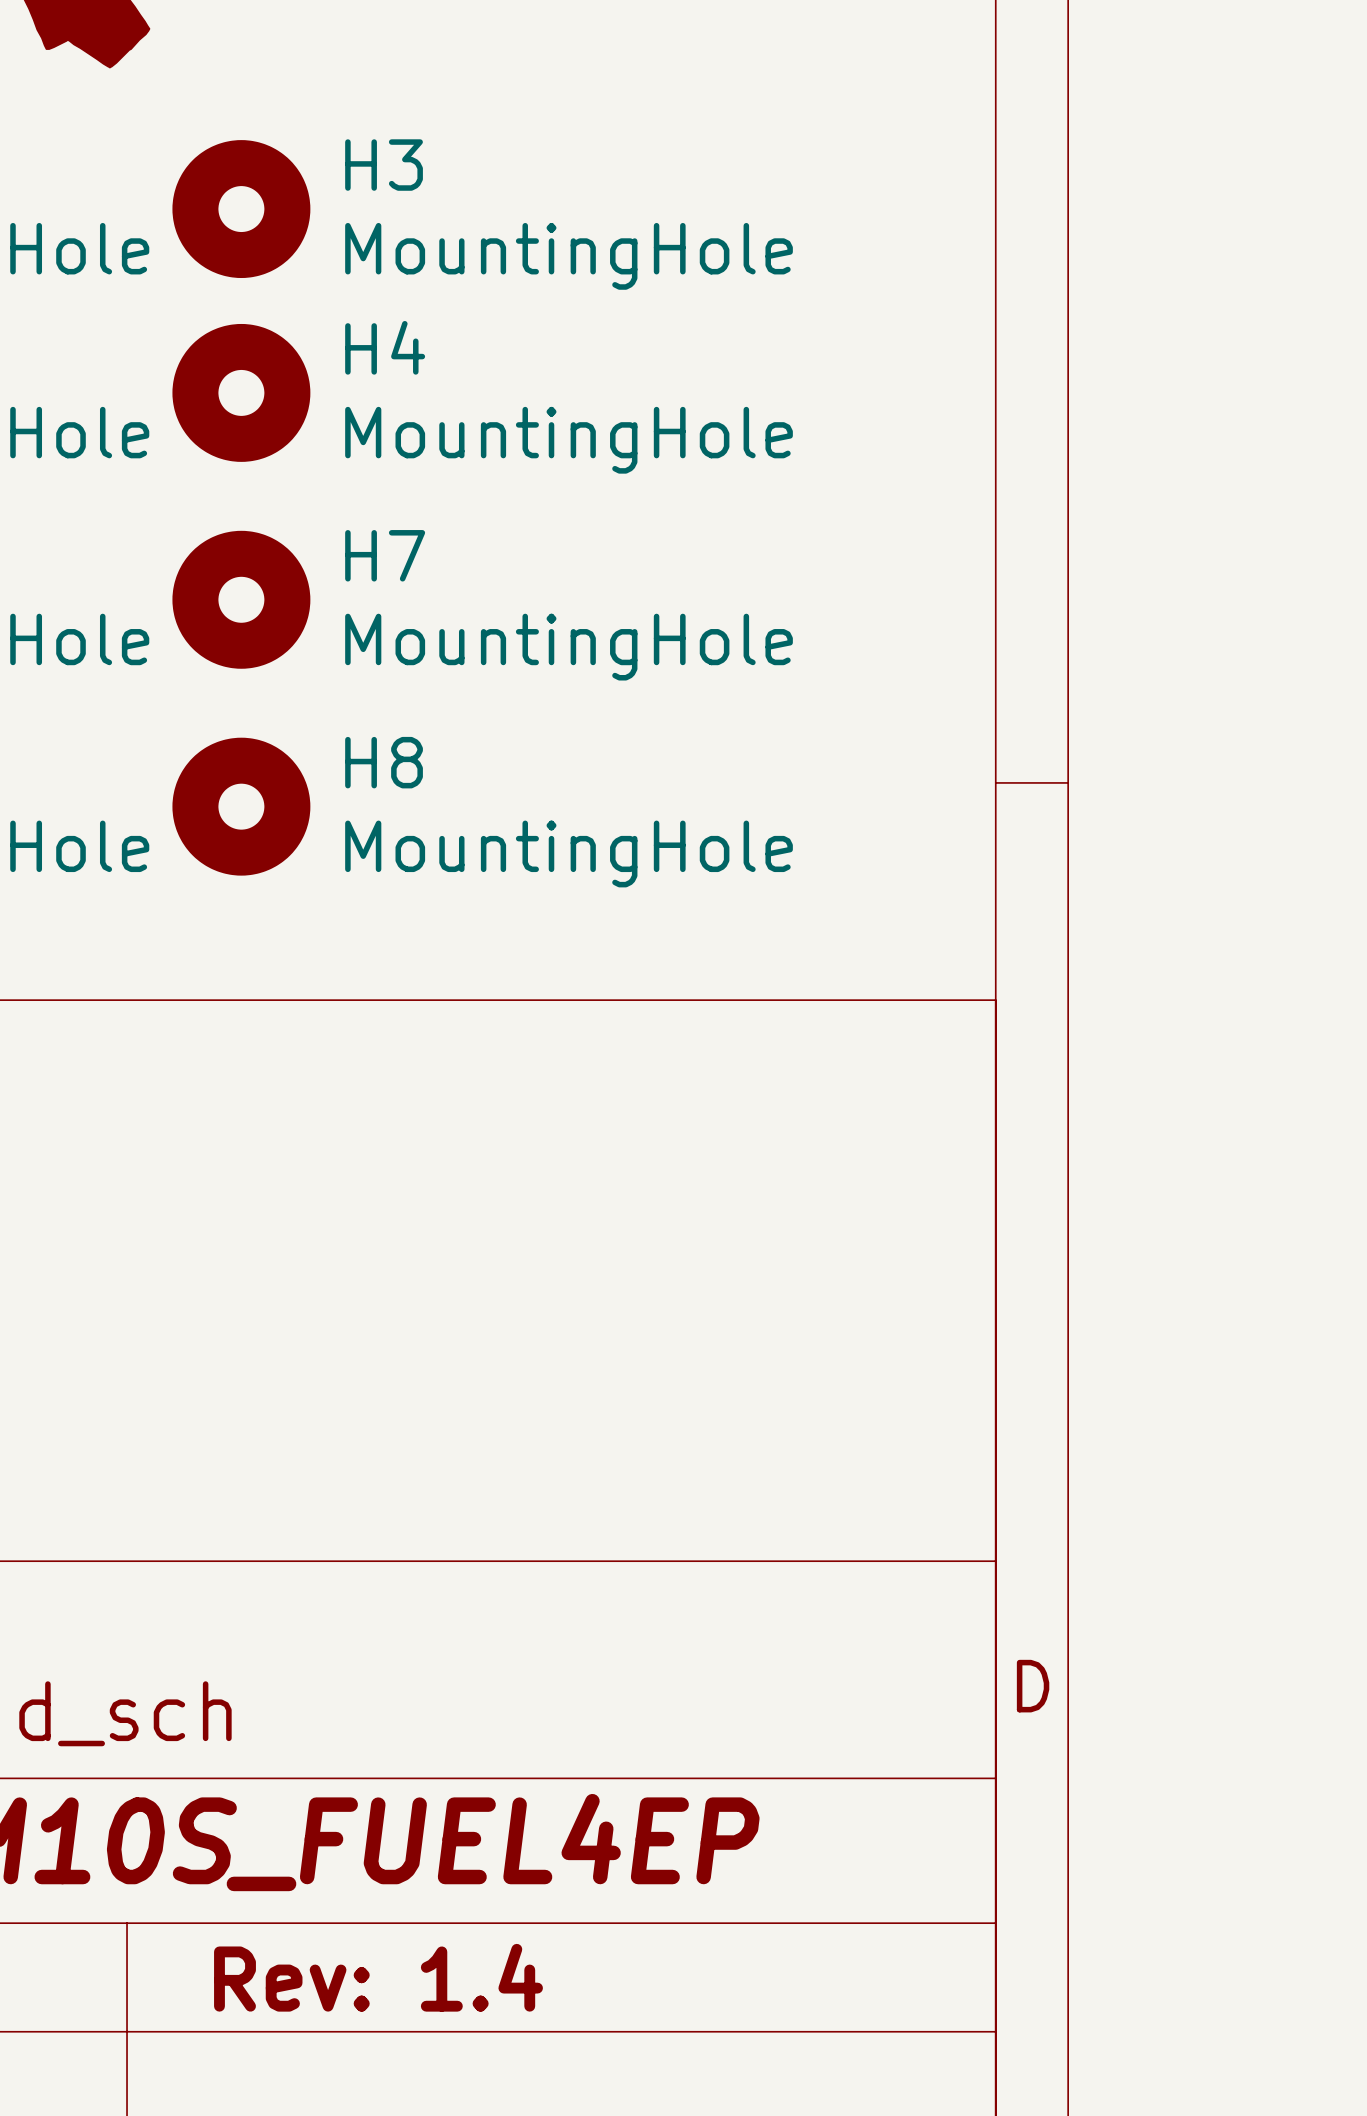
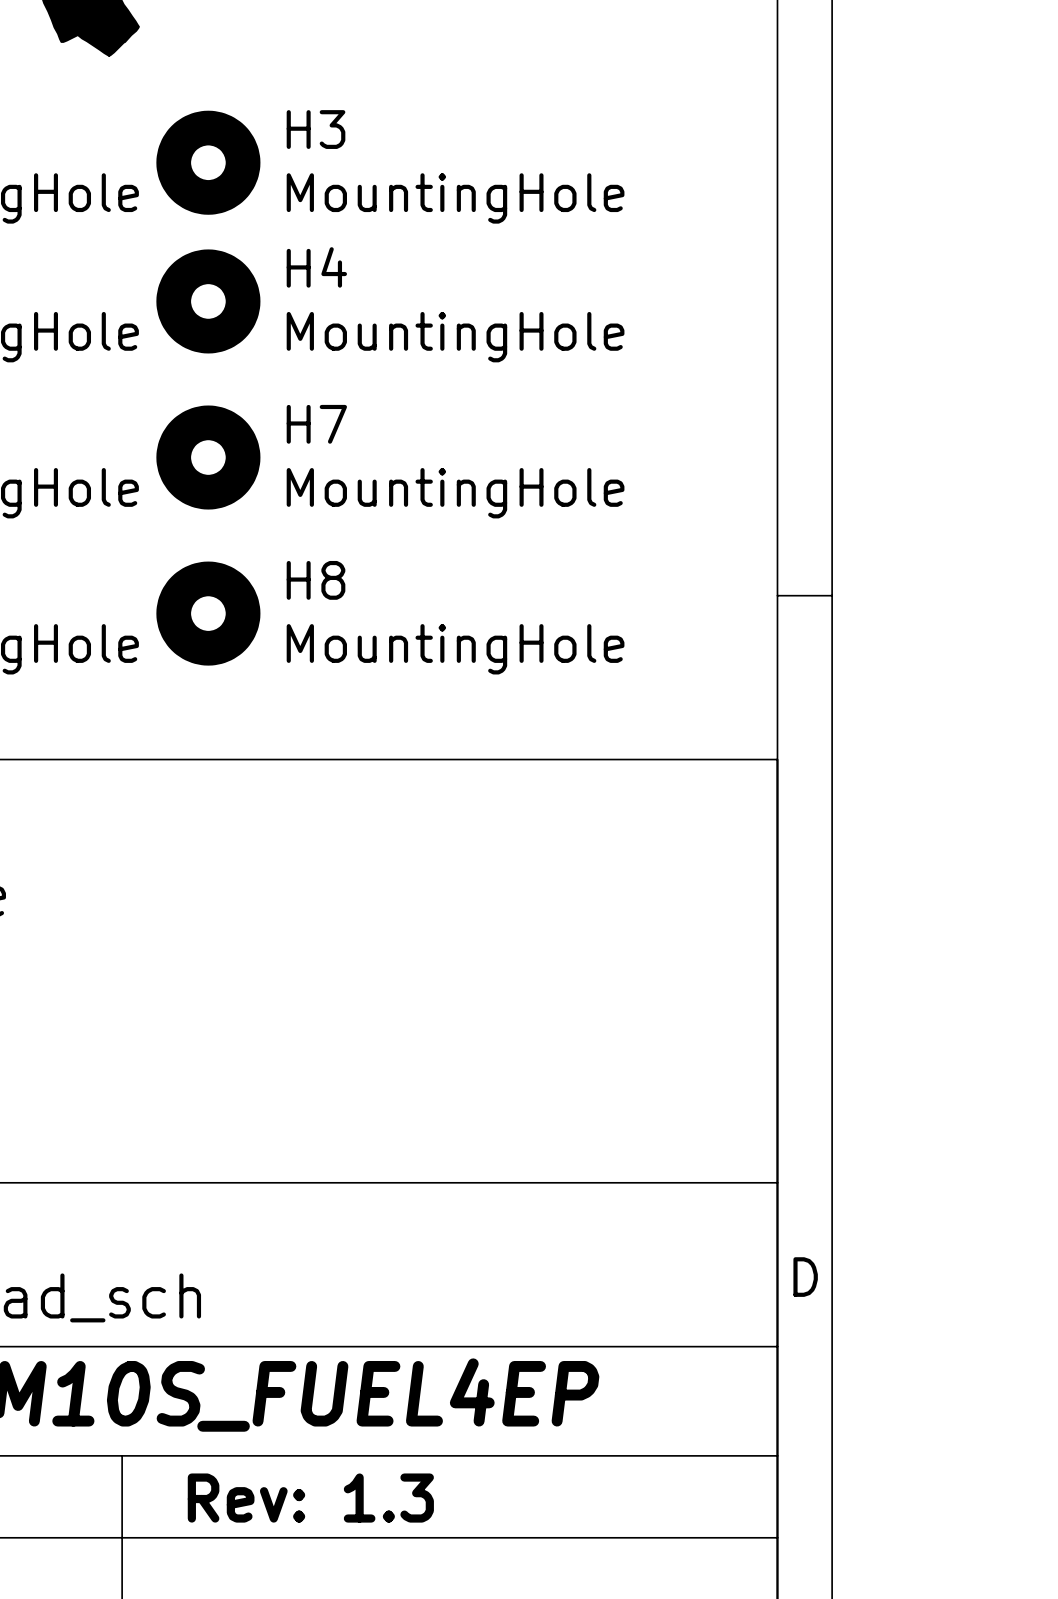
title block: Rev: 1.4 (378, 1977) -> Rev: 1.3 (310, 1498)

